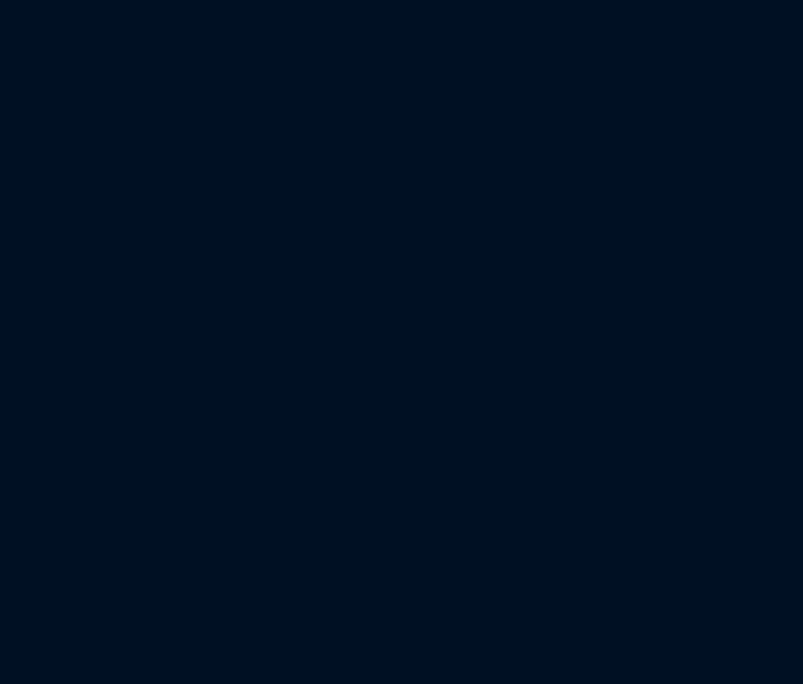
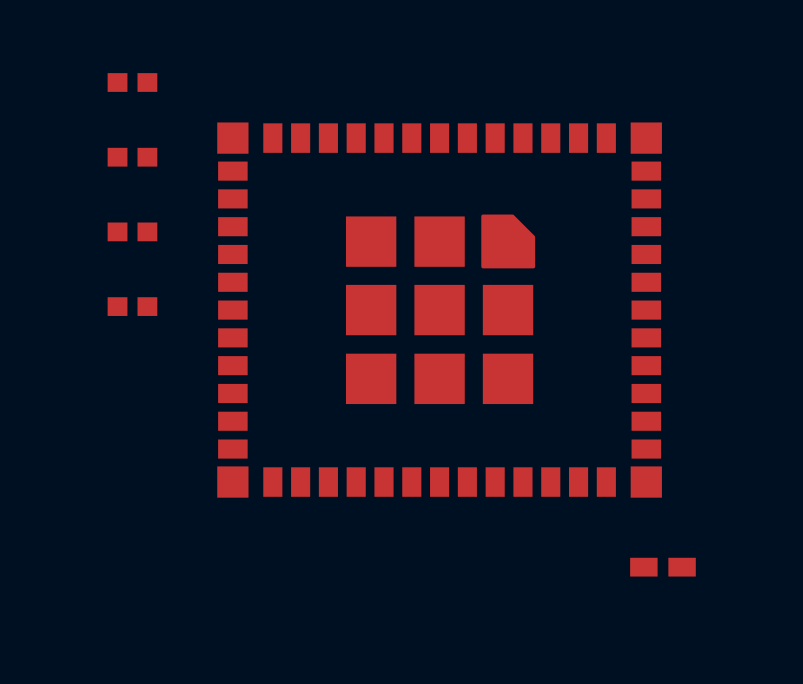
part: none -> (132, 82)
part: none -> (132, 157)
part: none -> (132, 231)
part: none -> (132, 306)
part: none -> (439, 310)
part: none -> (662, 567)

